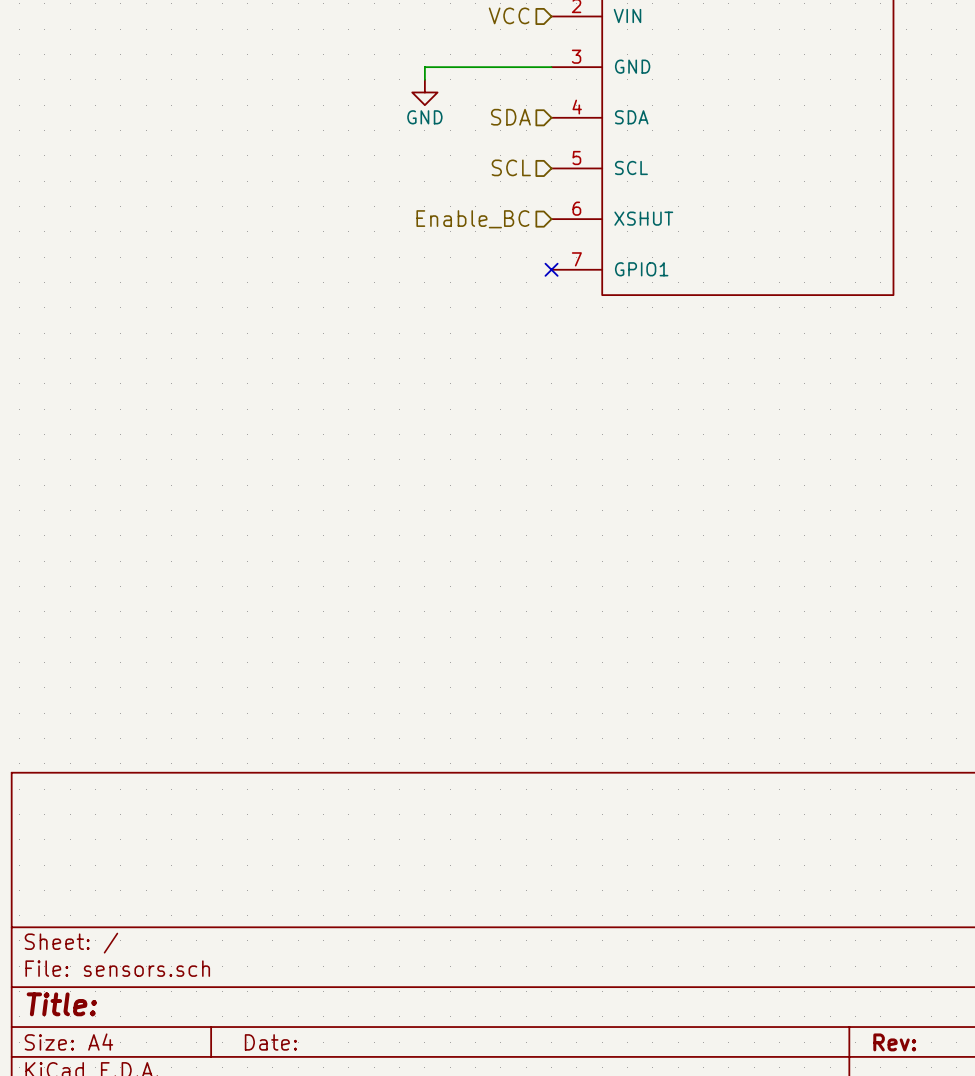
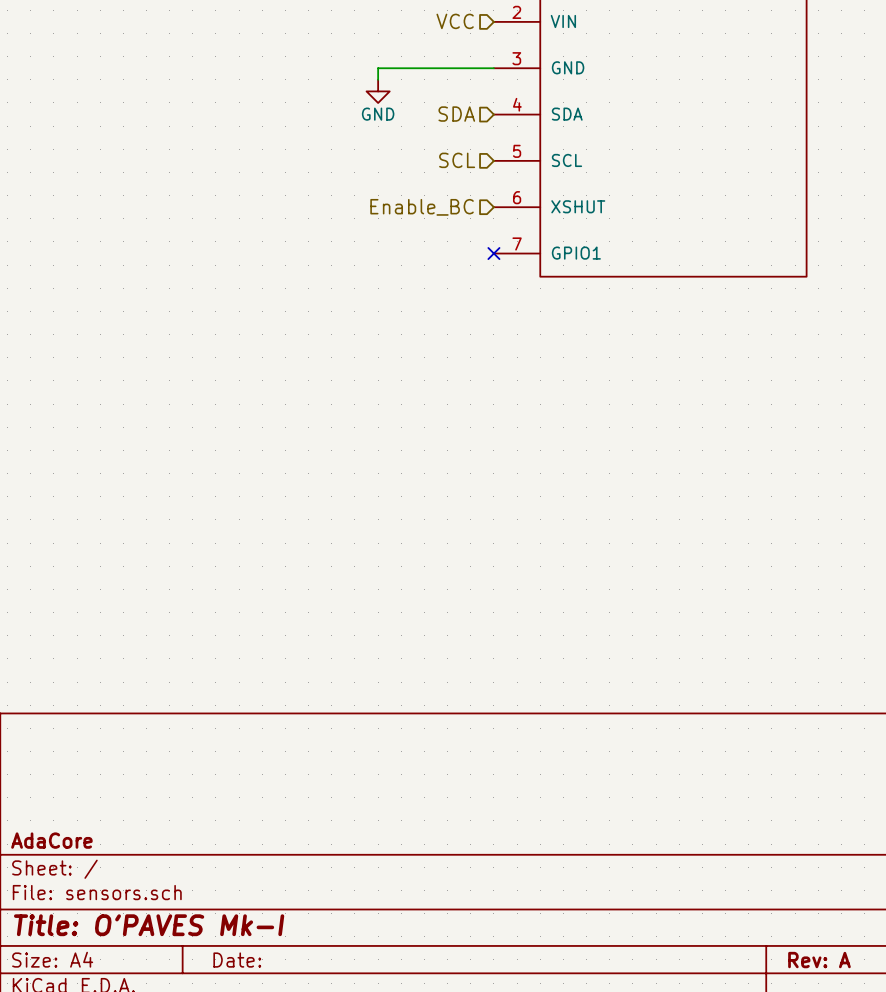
title block: none -> AdaCore (51, 840)
title block: Title: (61, 1004) -> Title: O'PAVES Mk-I (149, 925)
title block: Rev: (894, 1042) -> Rev: A (819, 960)

